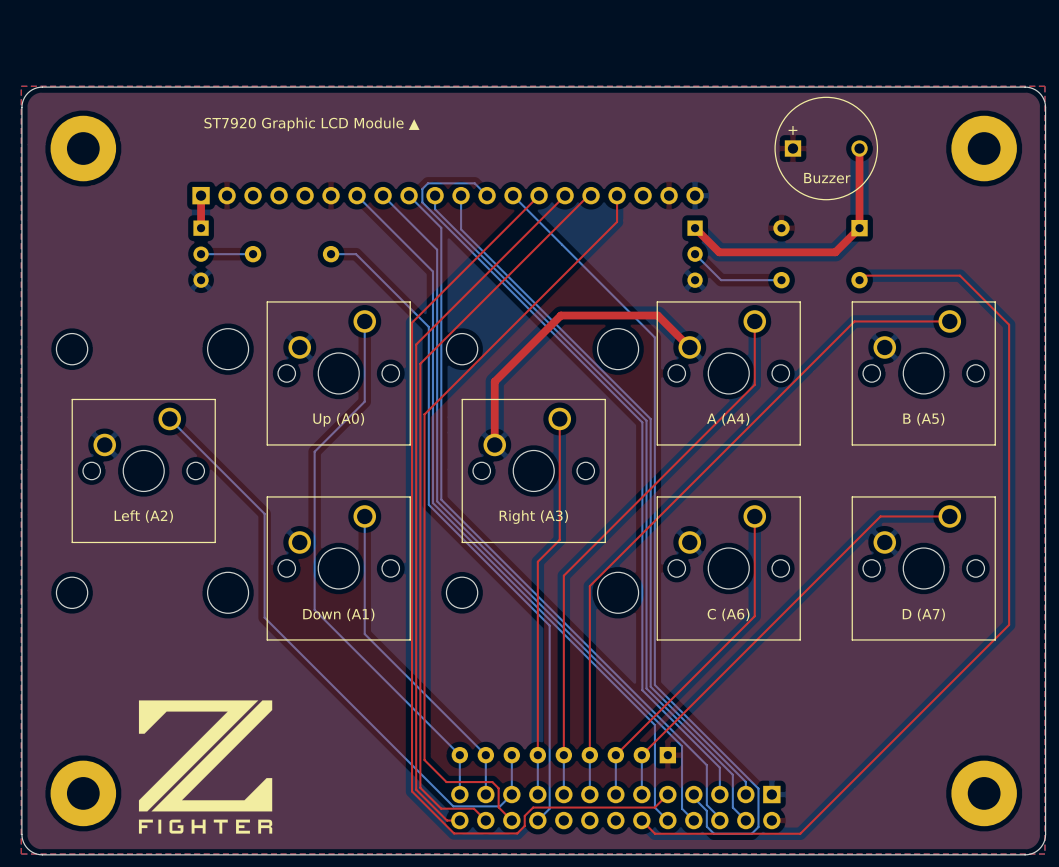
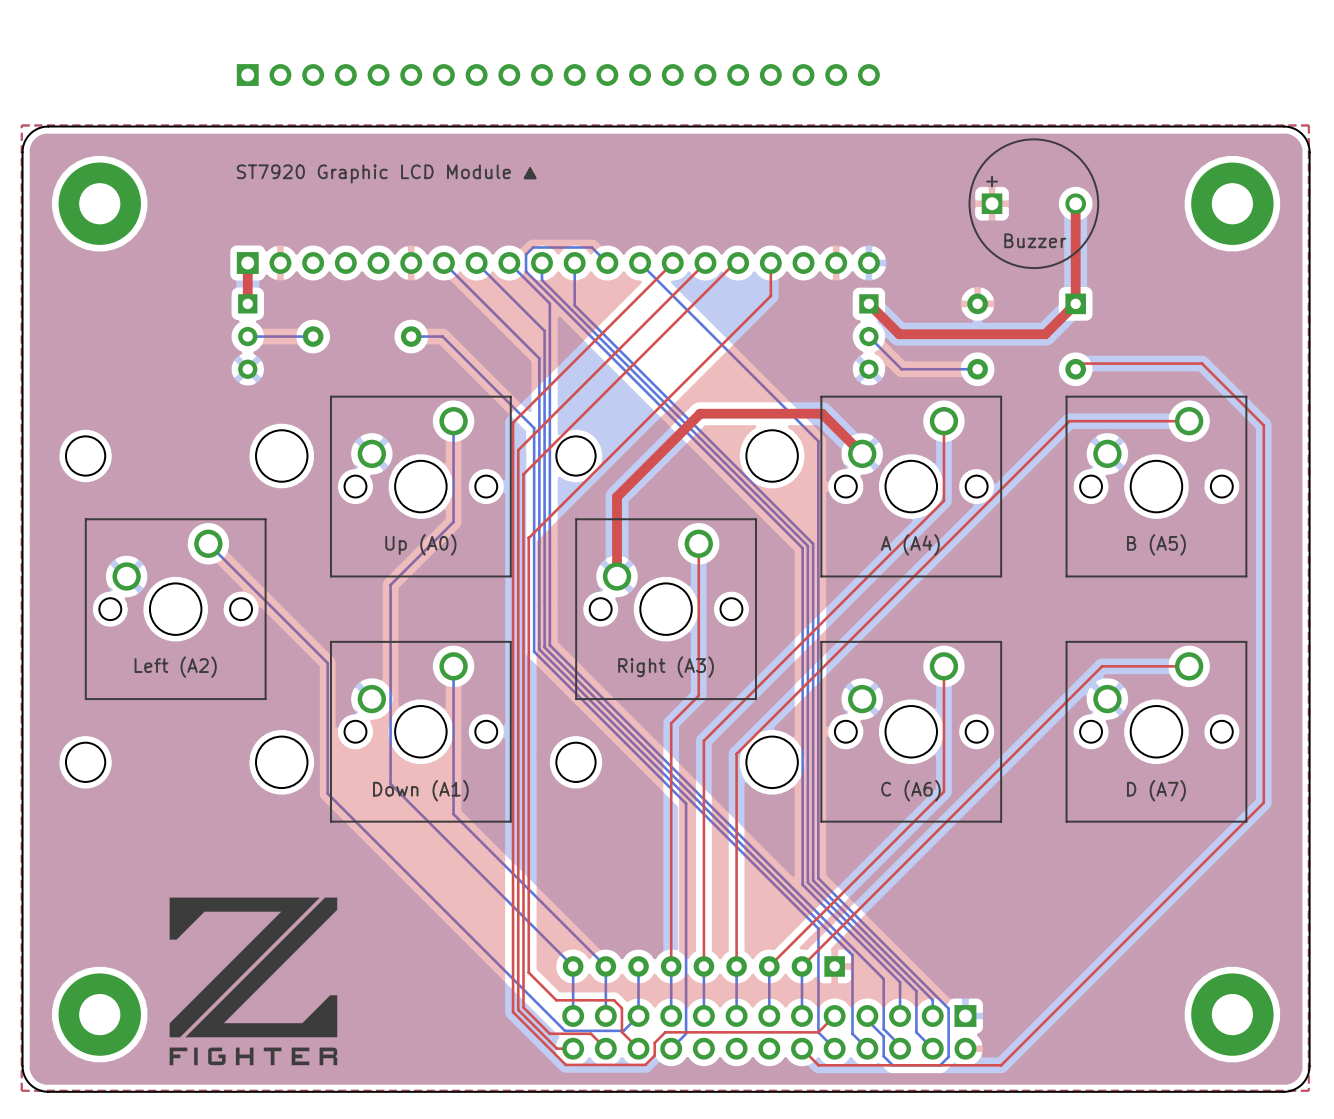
part: none -> (558, 75)

